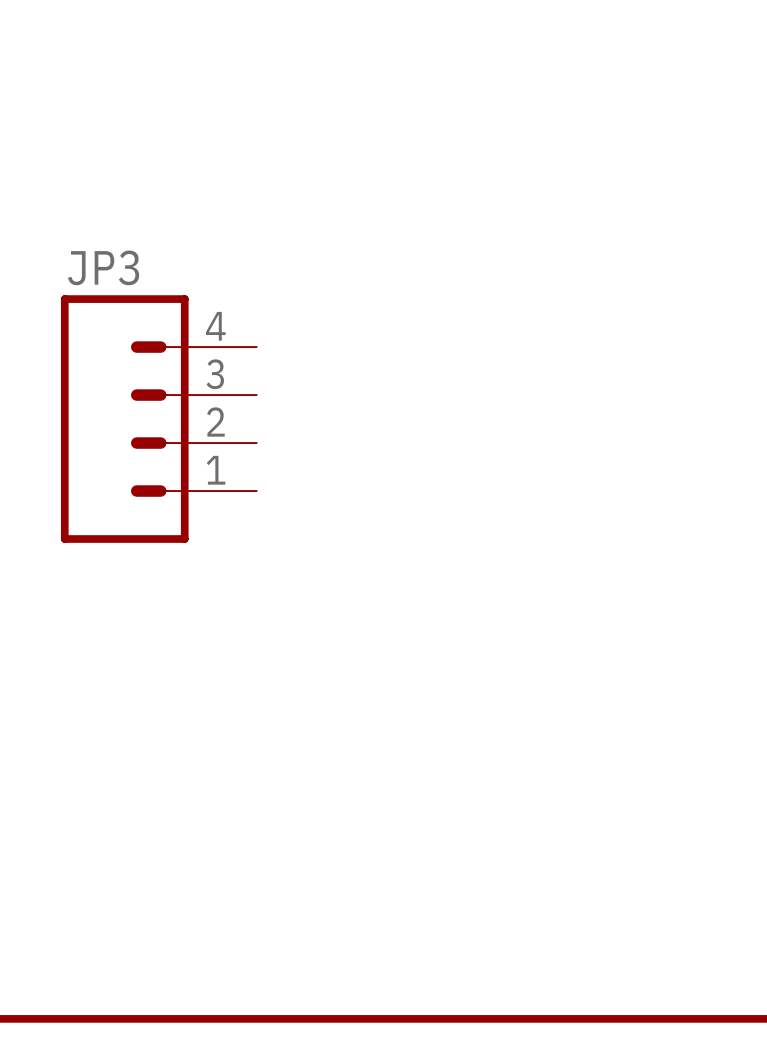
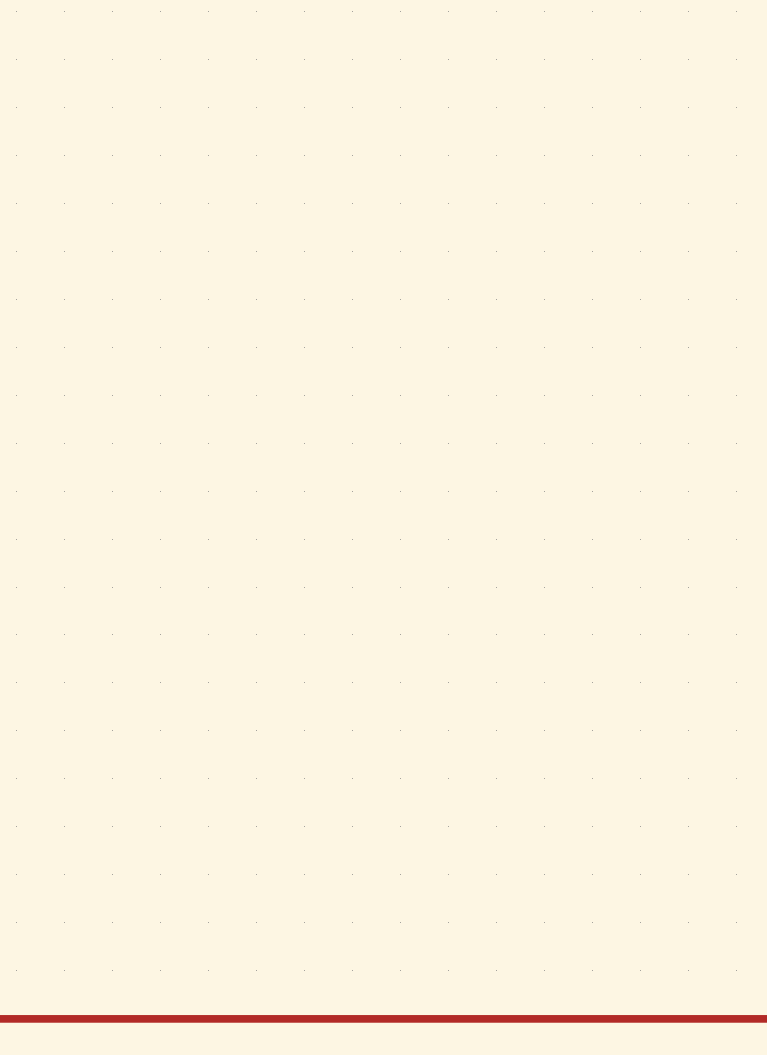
JP3: (158, 419) -> none

